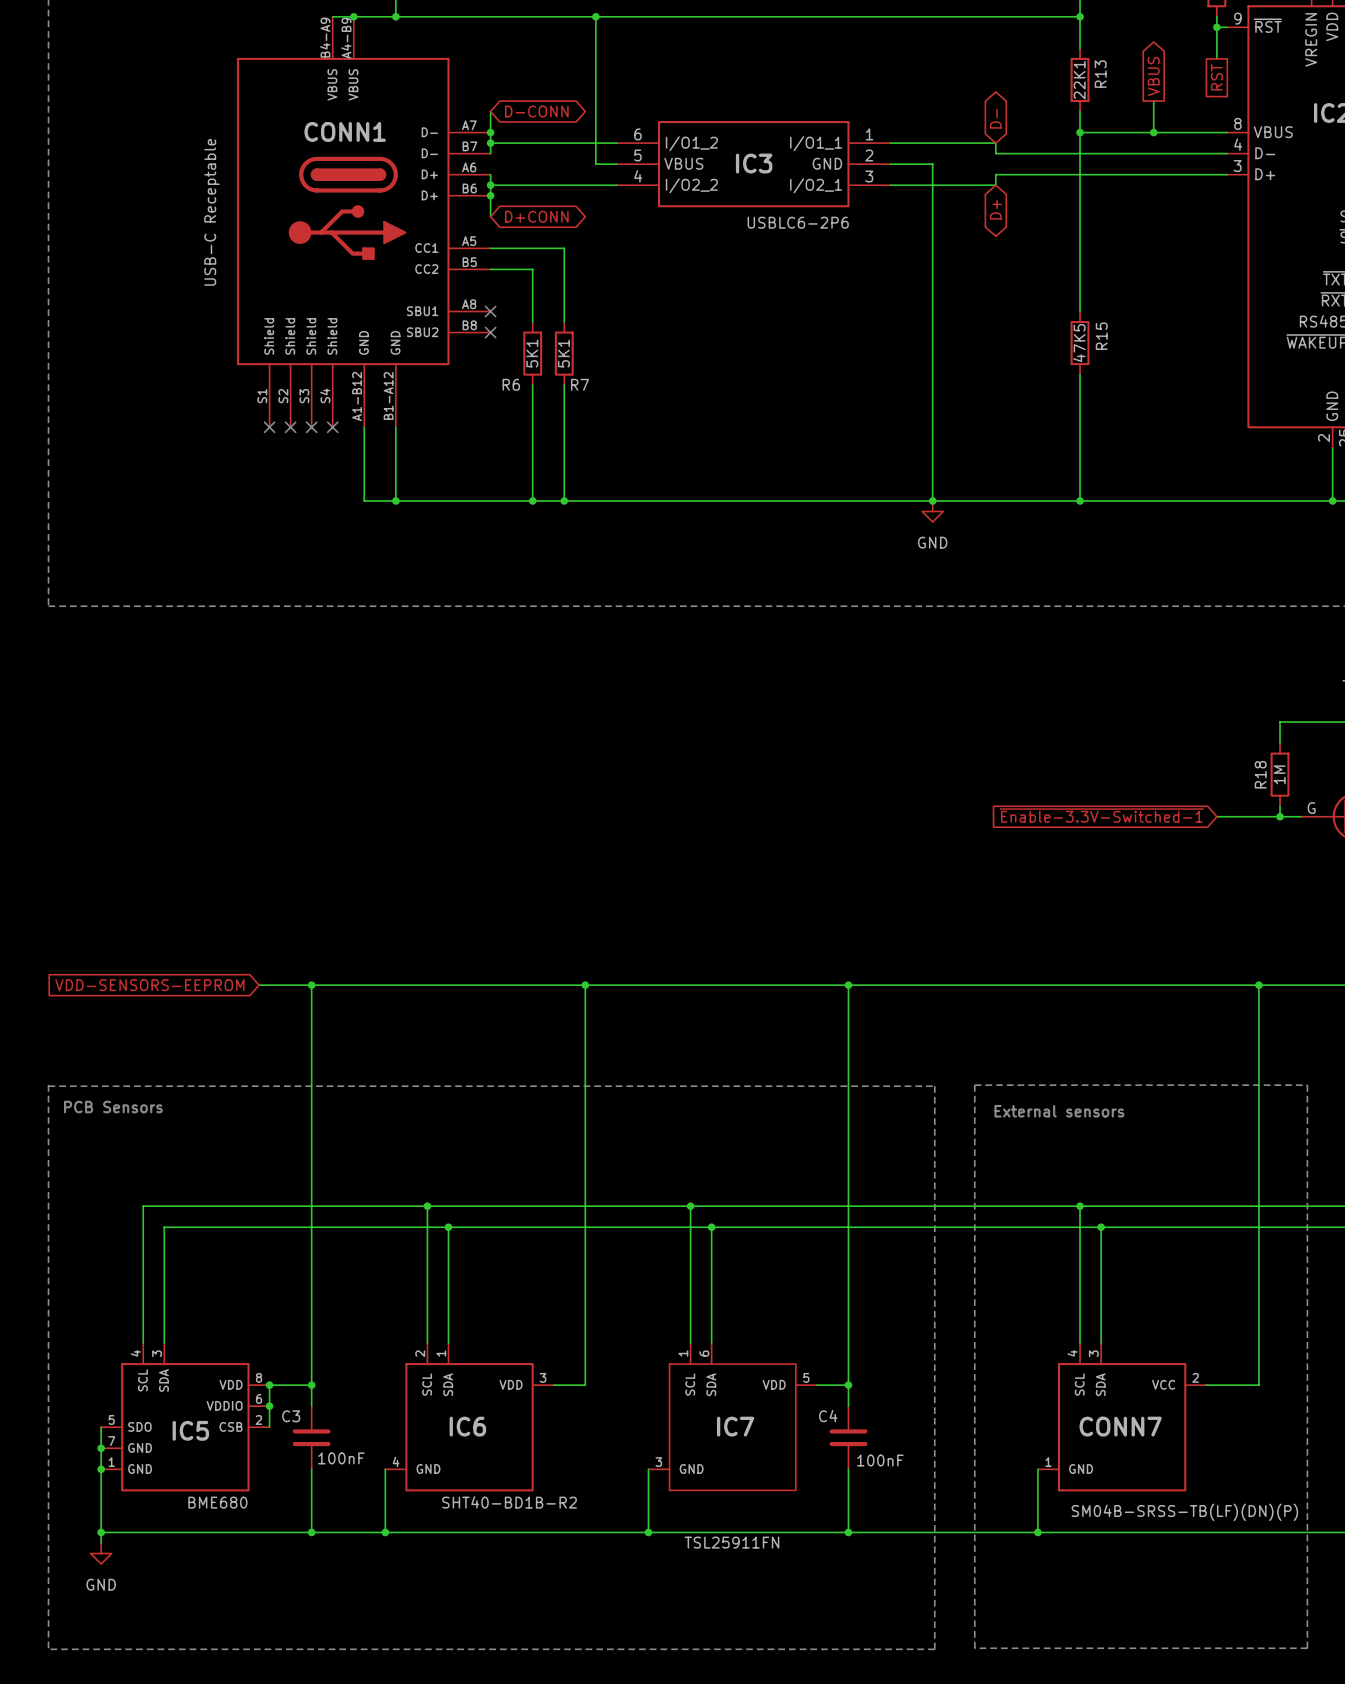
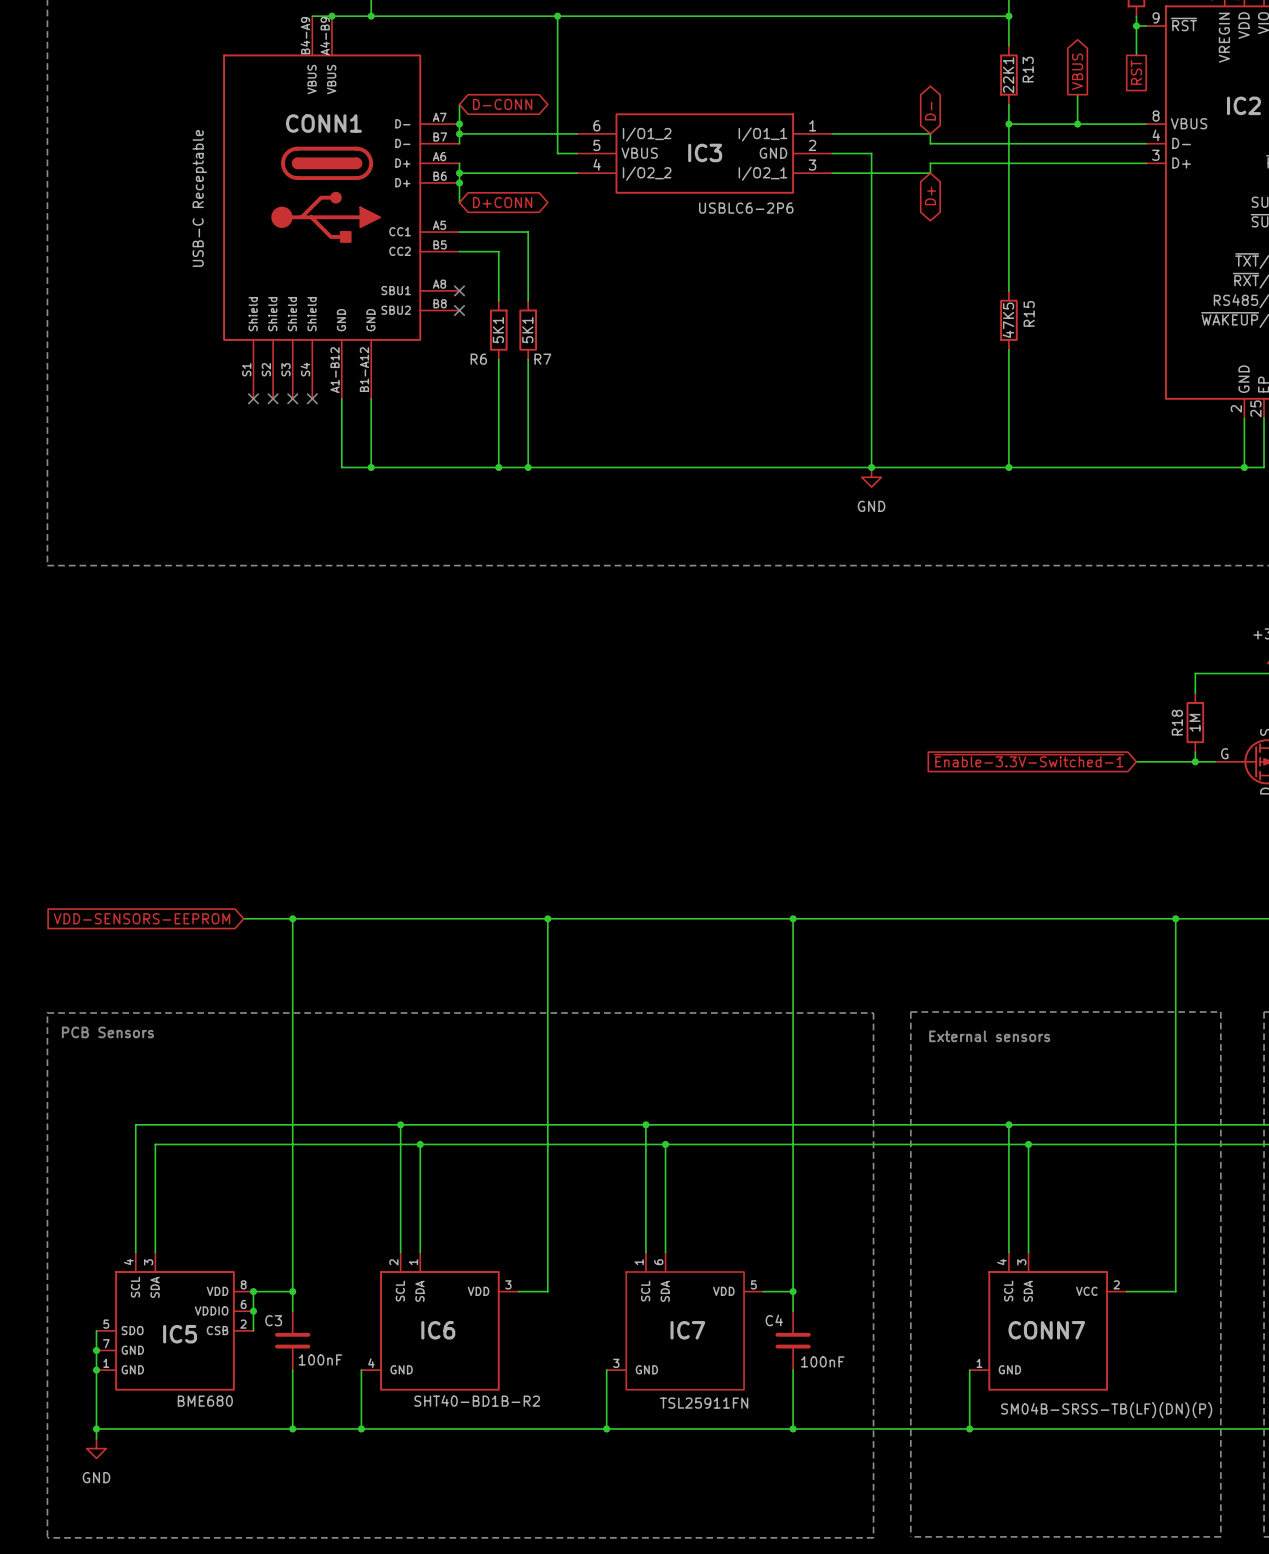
IC7 value position: TSL25911FN (731, 1542) -> TSL25911FN (704, 1403)

